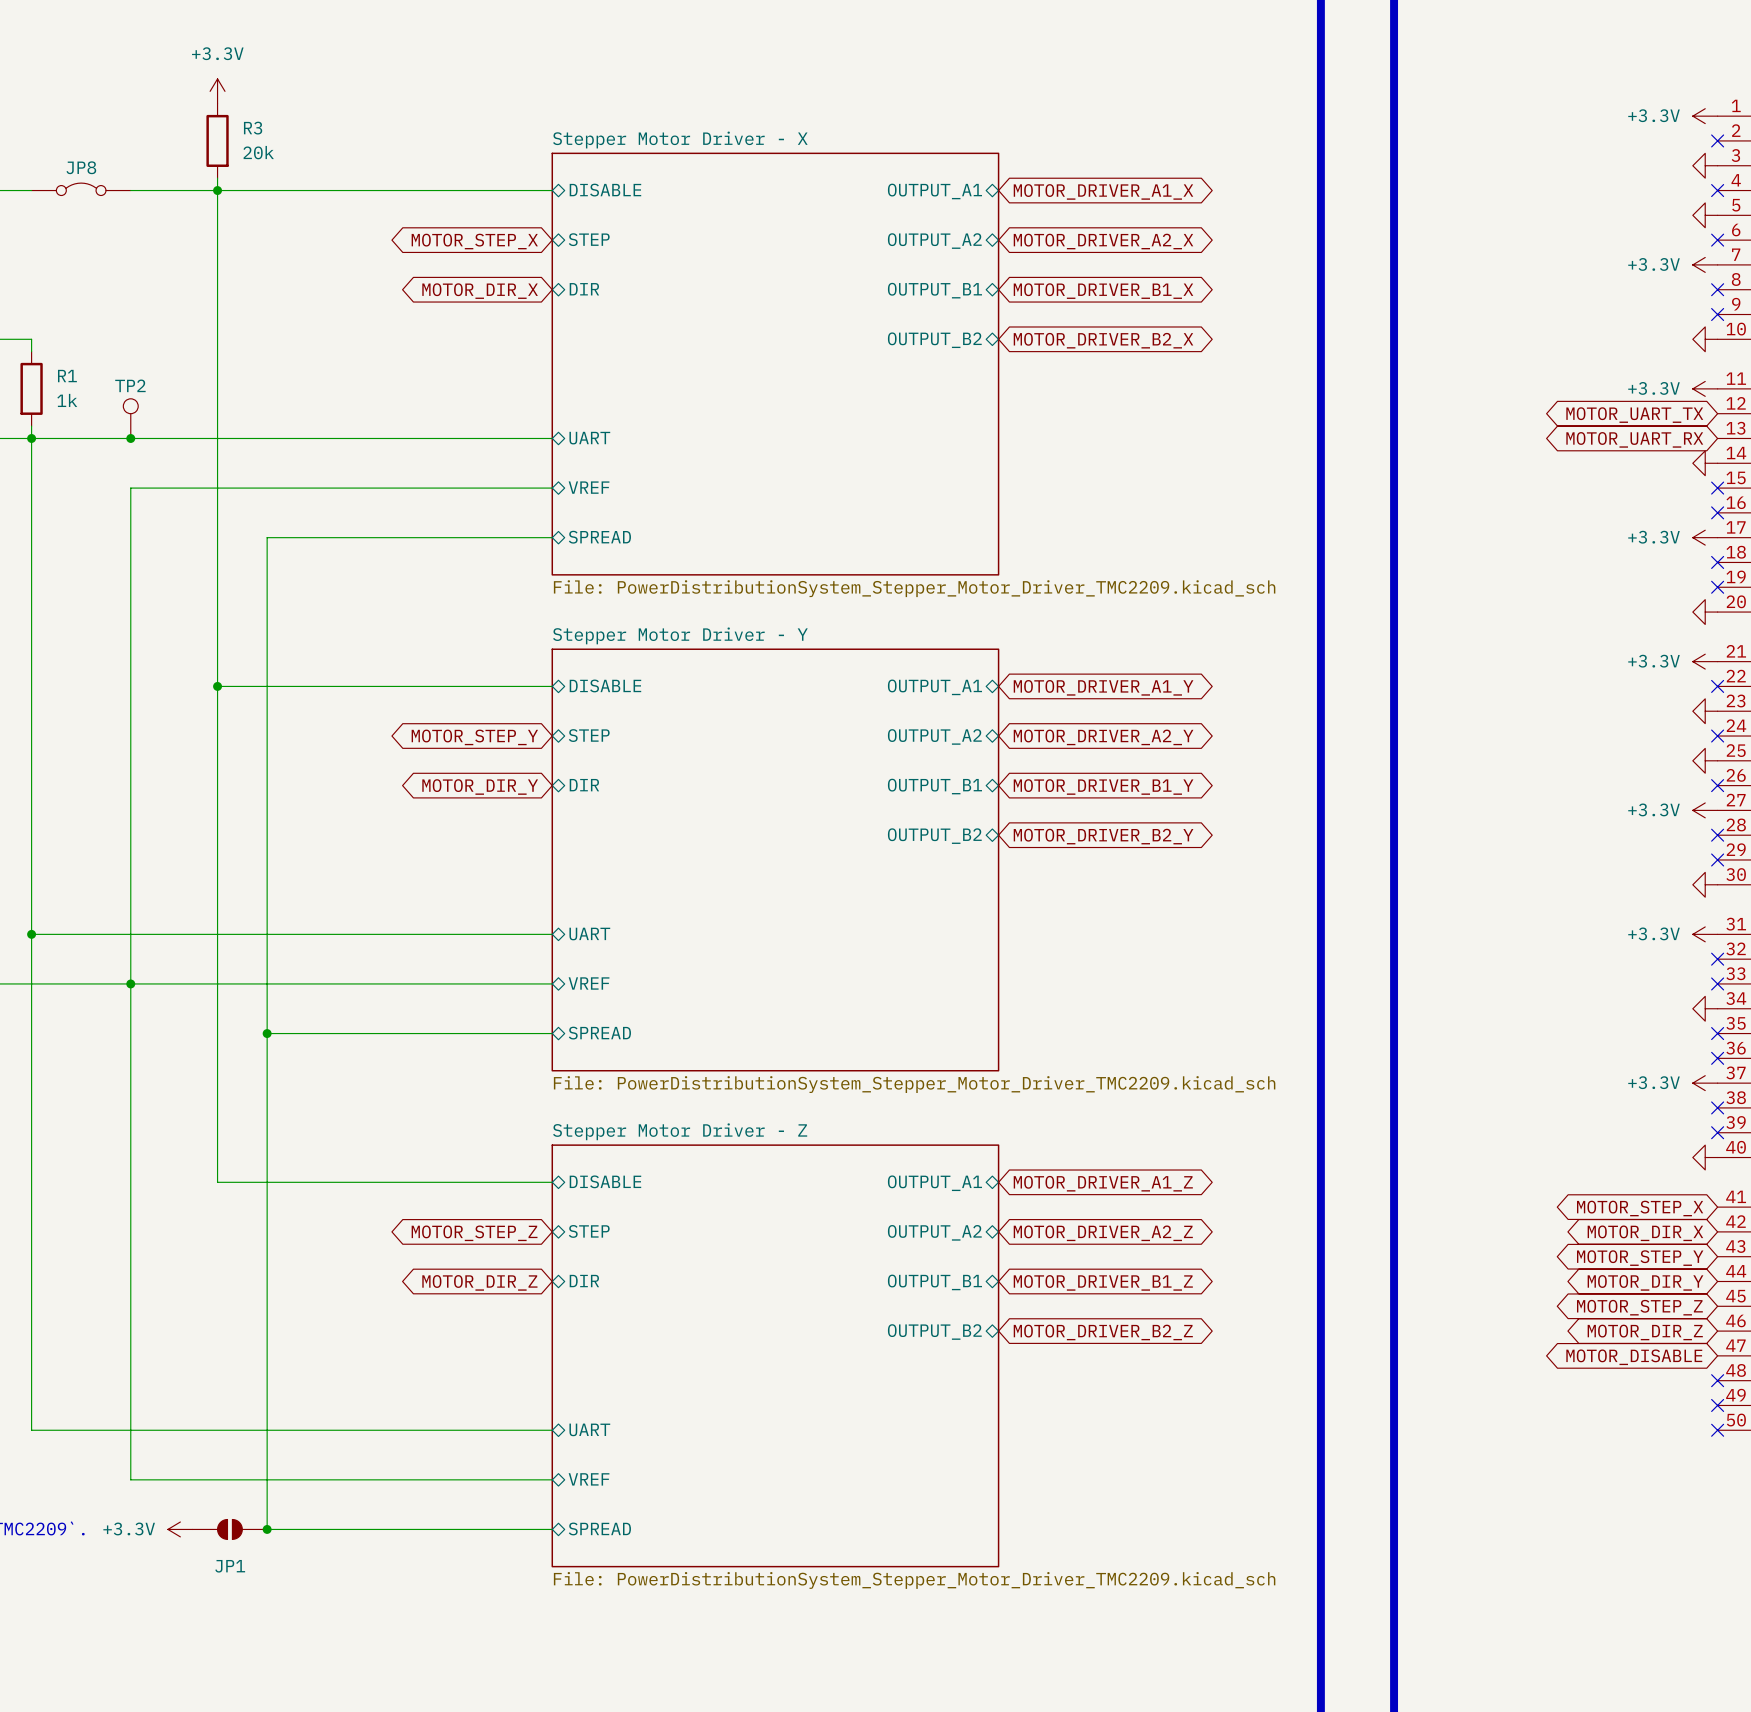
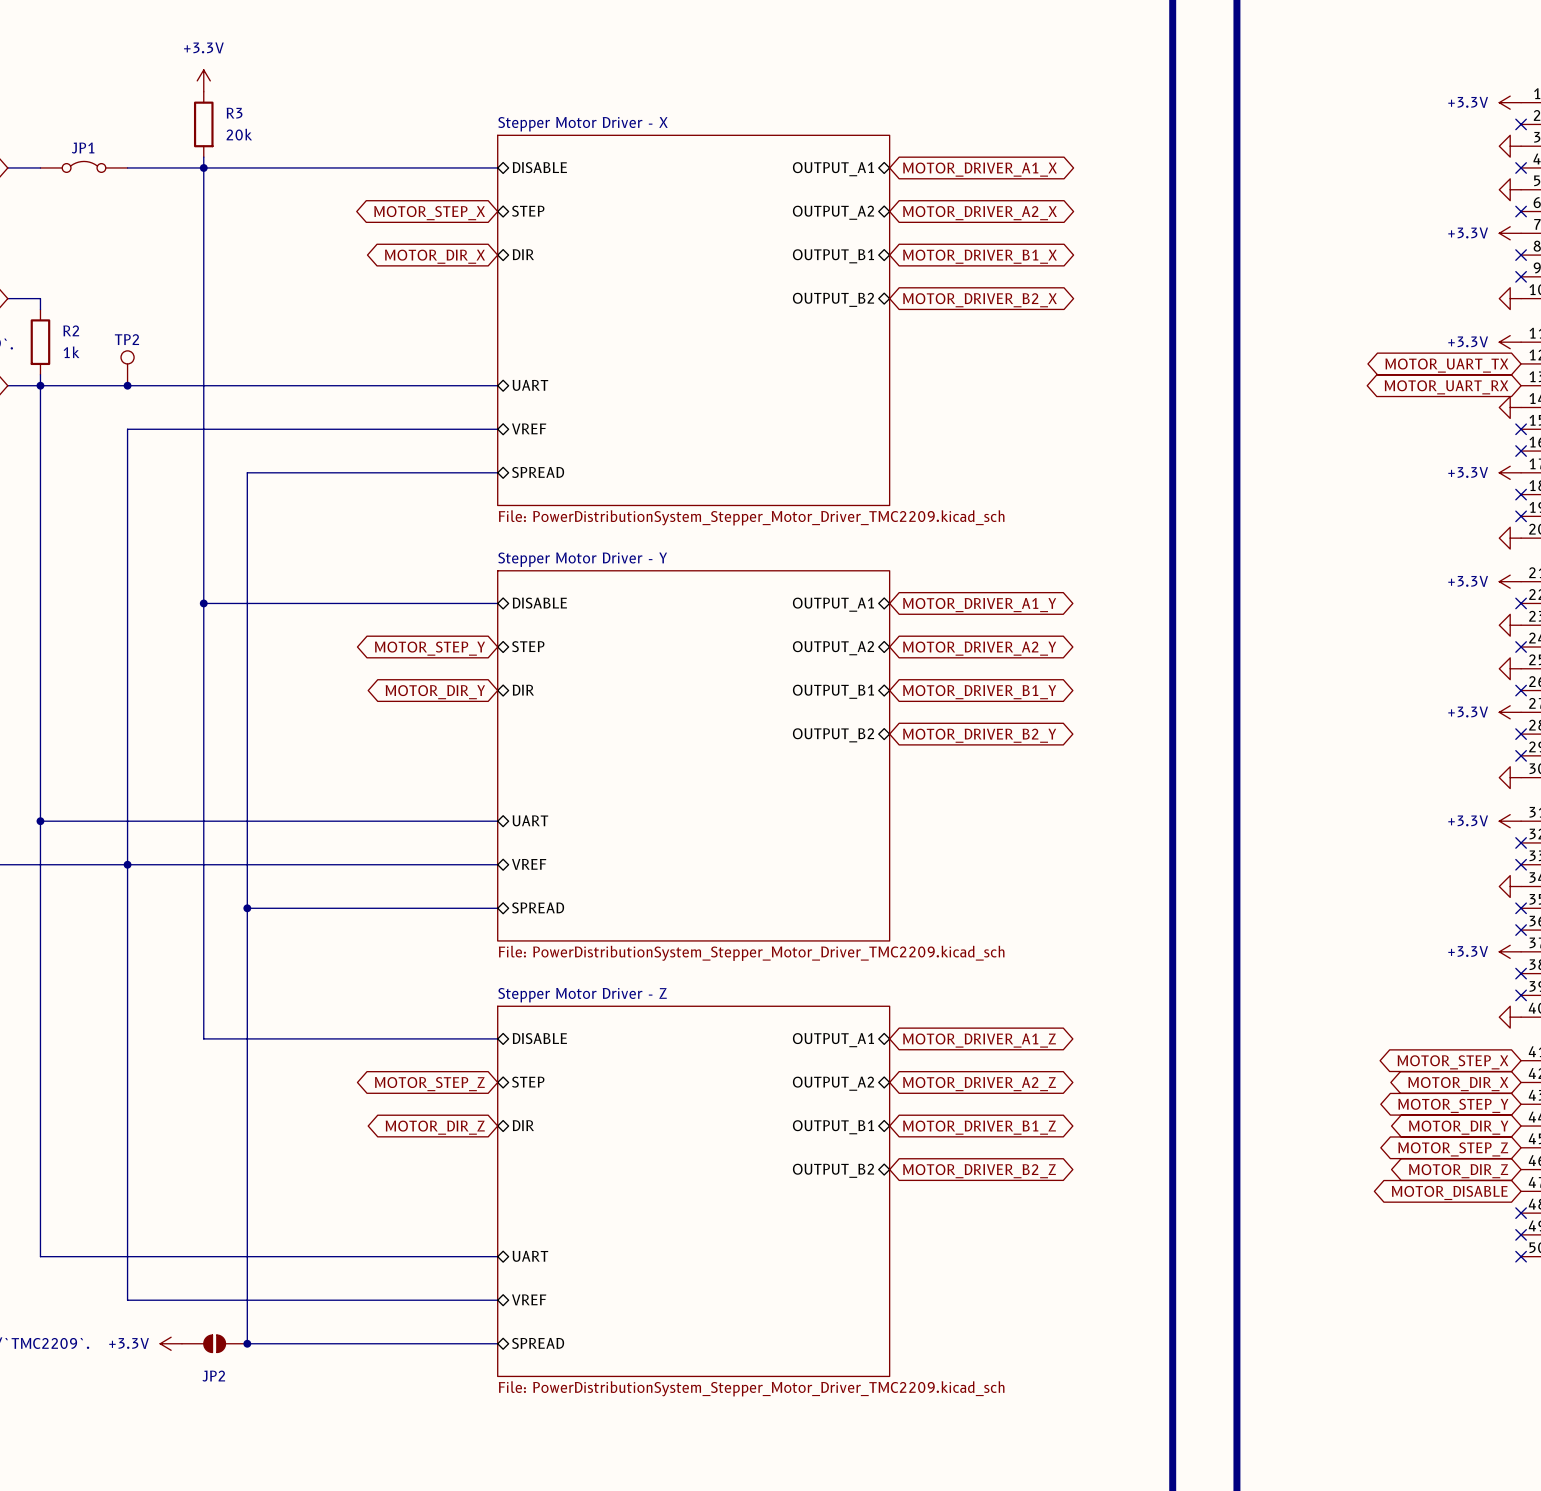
JP8 name: JP8 (81, 167) -> JP1 (83, 148)
R1 name: R1 (67, 376) -> R2 (71, 330)
JP1 name: JP1 (230, 1566) -> JP2 (213, 1376)

